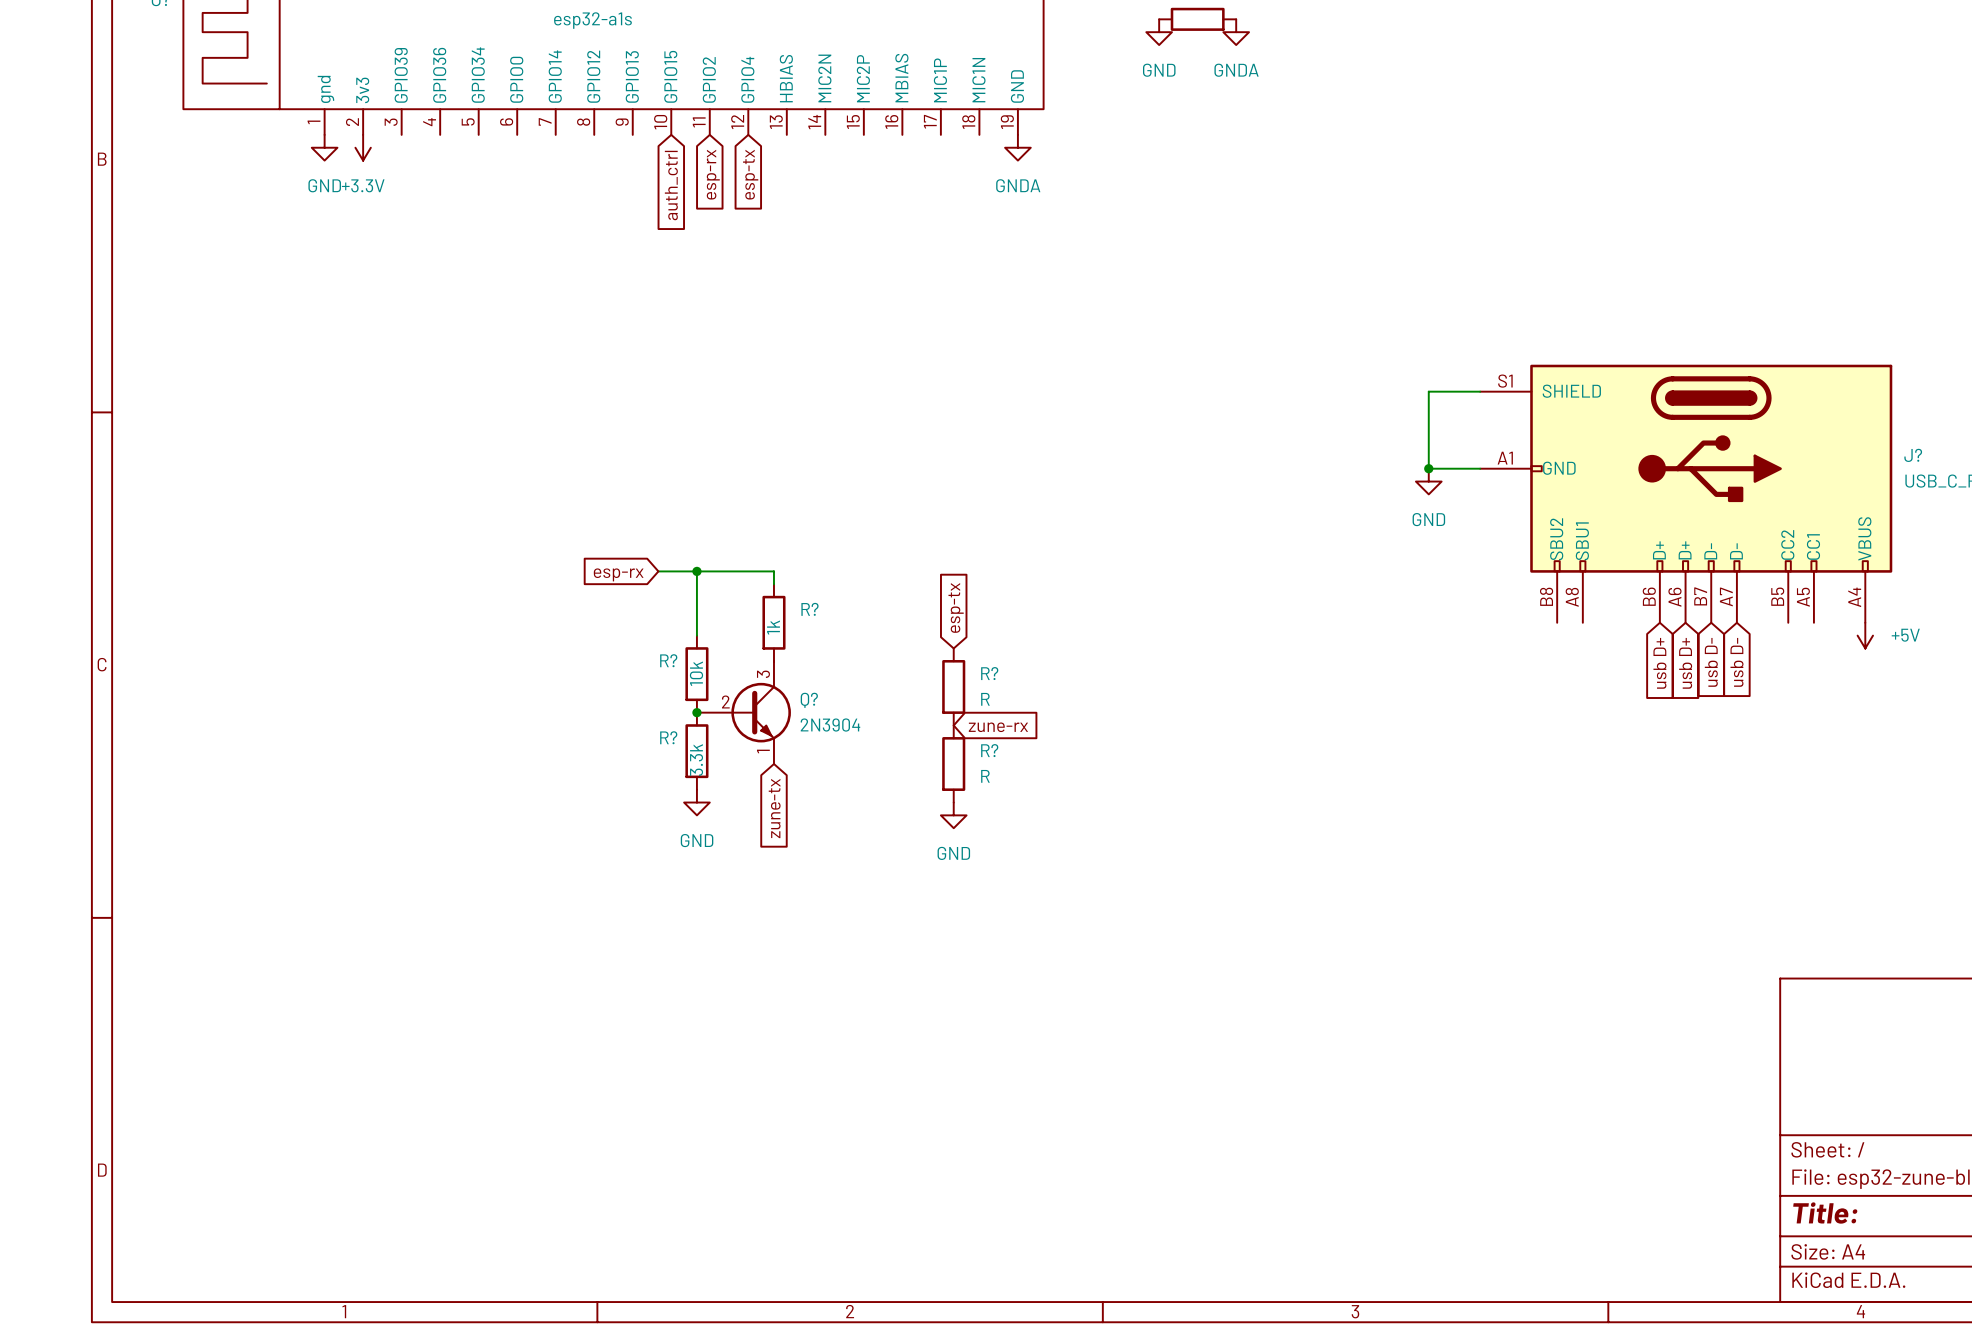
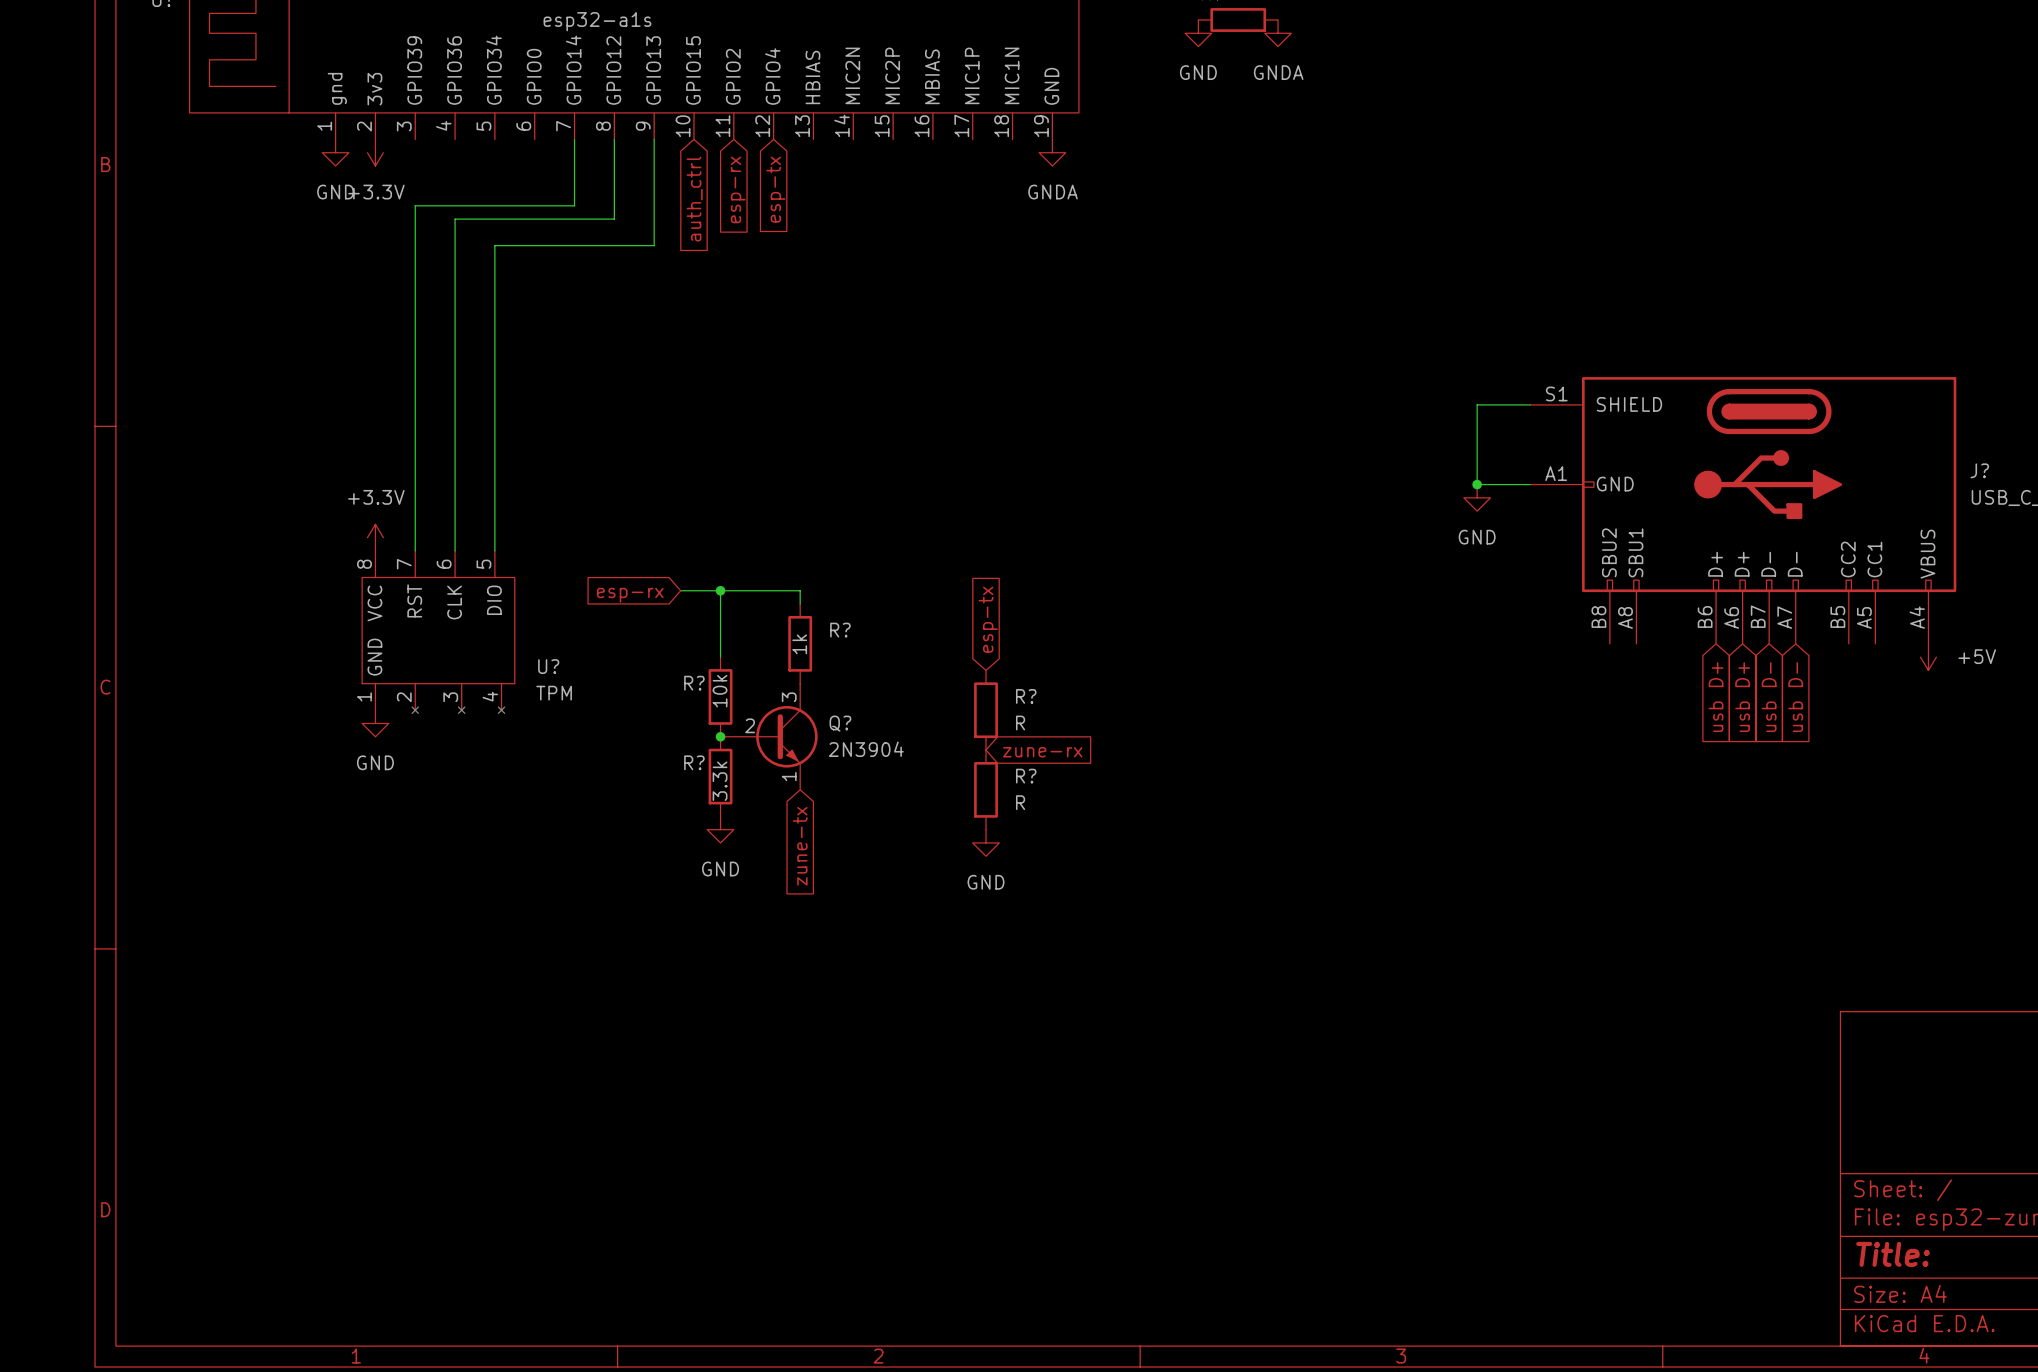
wire: none -> (574, 139) (574, 205) (415, 205) (415, 550)
wire: none -> (614, 139) (614, 219) (455, 219) (455, 550)
wire: none -> (654, 139) (654, 245) (494, 245) (494, 550)
power symbol: none -> +3.3V (375, 537)
U?: none -> TPM (438, 632)
power symbol: none -> GND (375, 723)

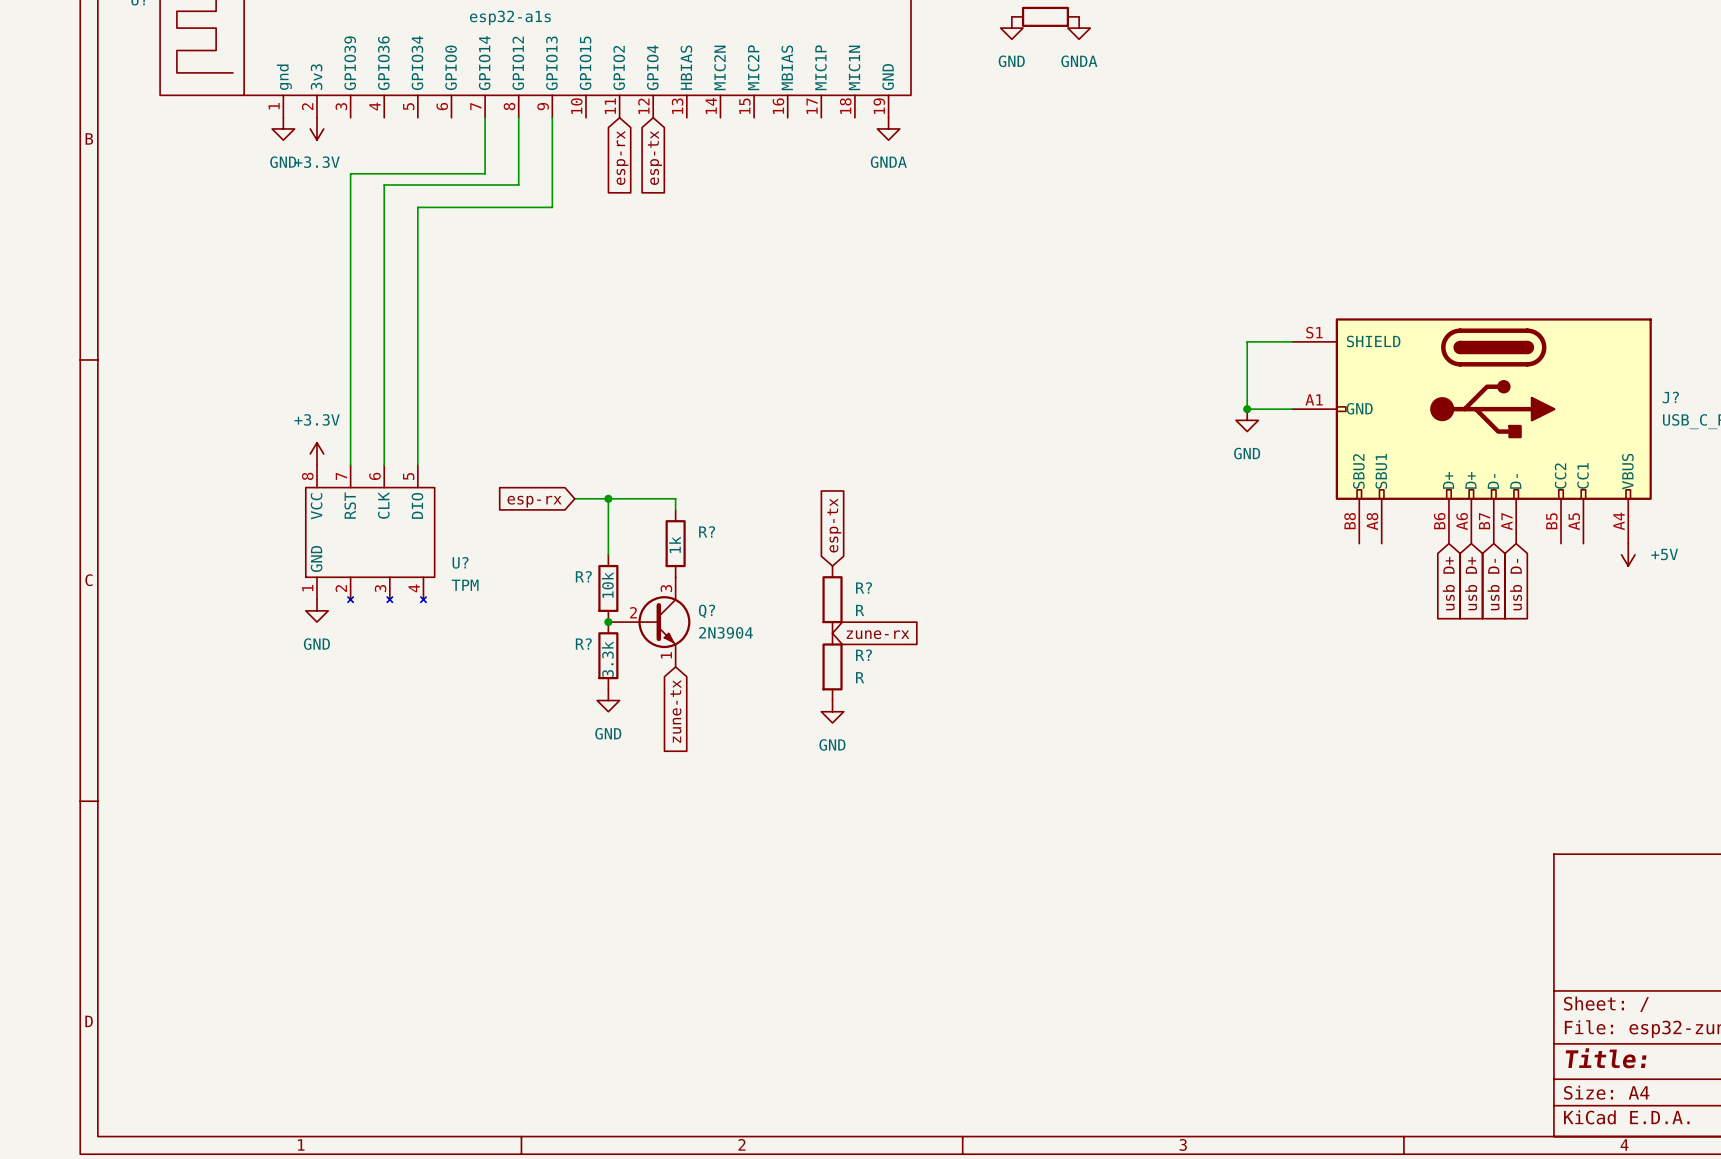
global label: auth_ctrl (694, 199) -> none

